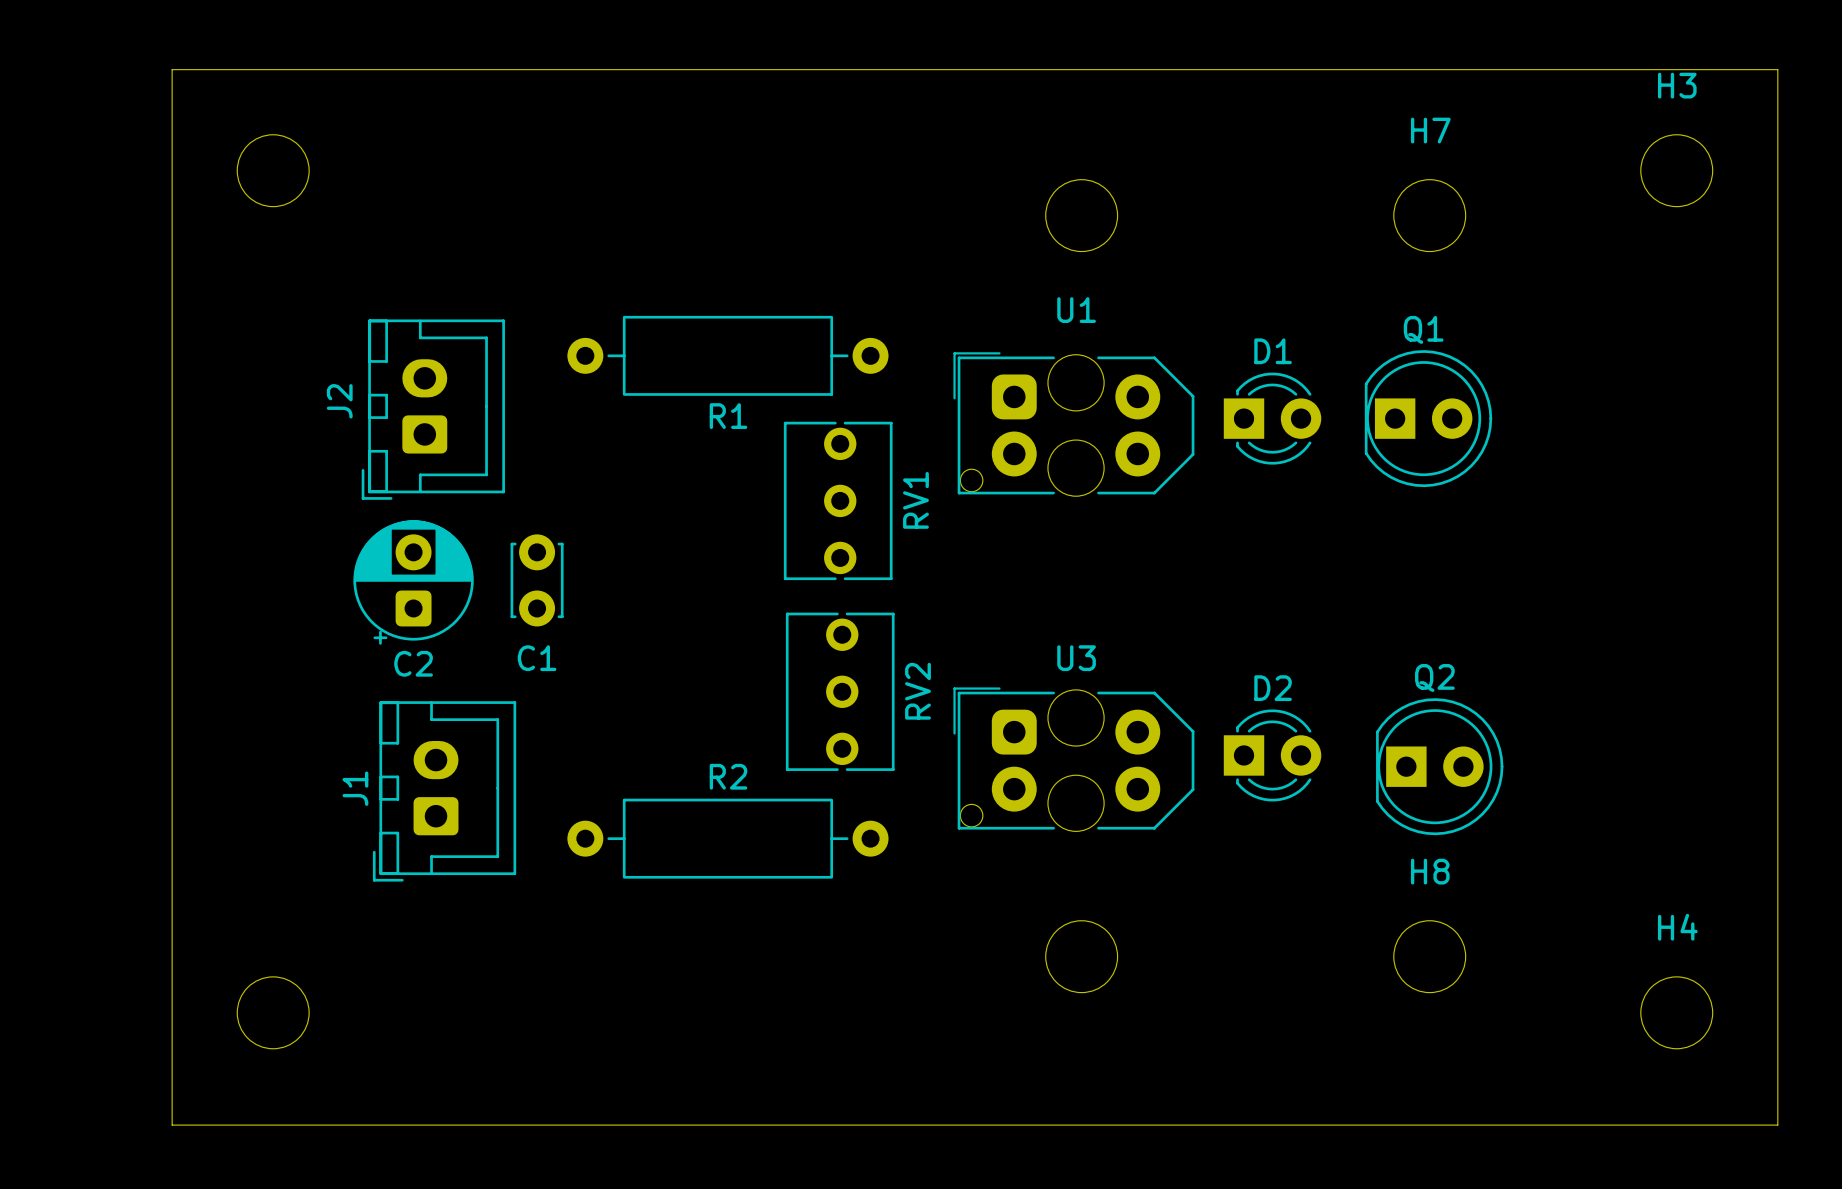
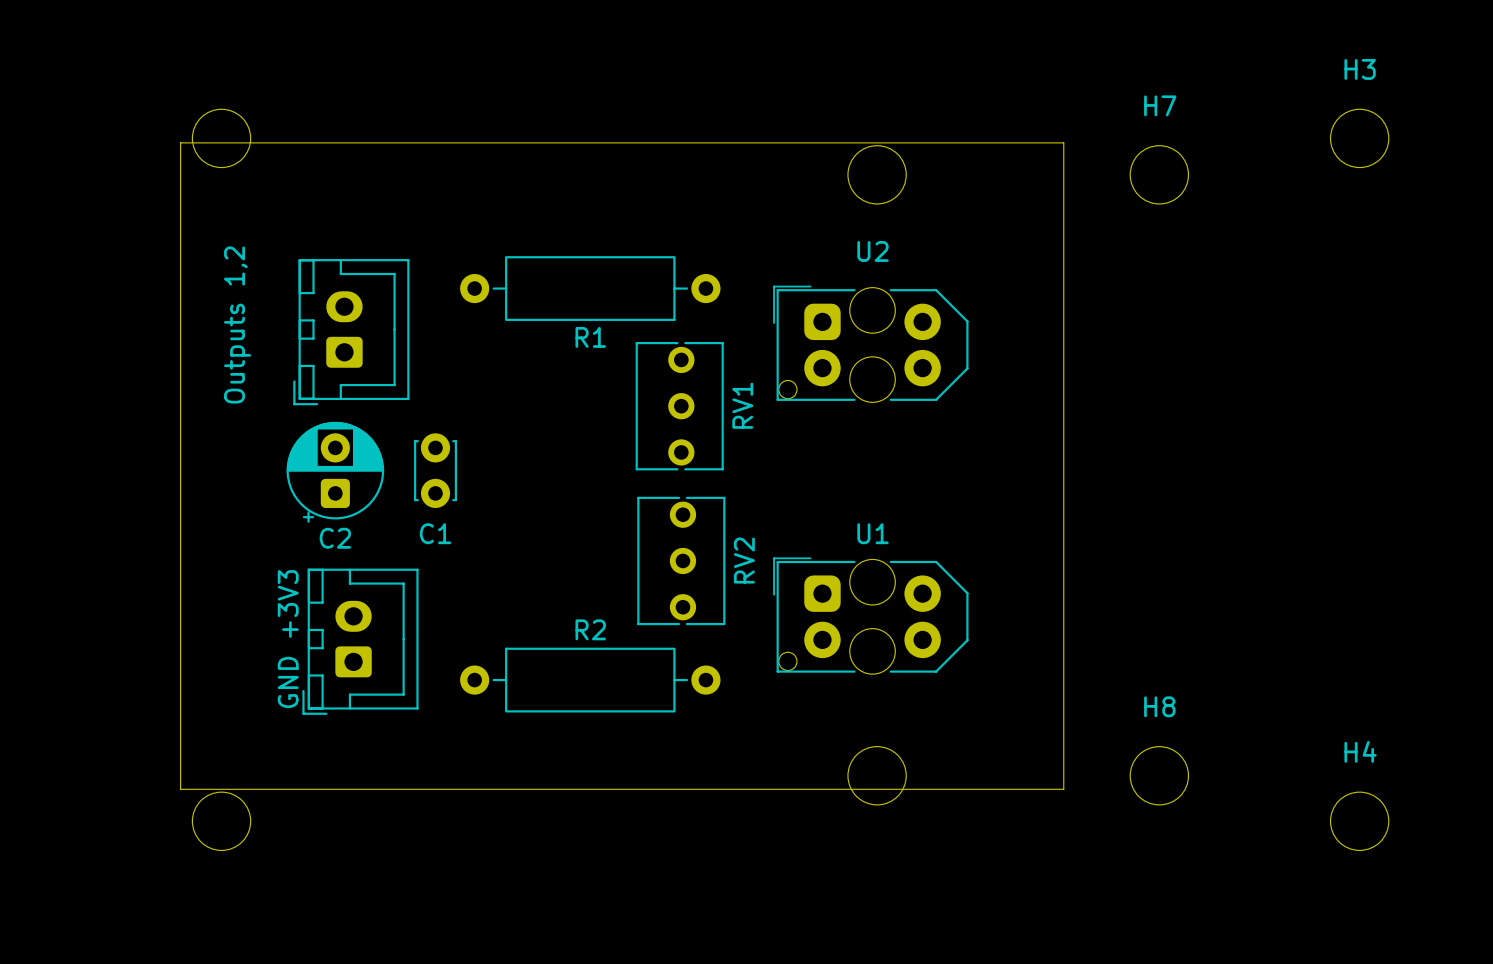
board edge: (172, 69) (1777, 69) (1777, 1125) (172, 1125) (172, 69) -> (180, 142) (180, 789) (1063, 789) (1063, 142) (180, 142)
U1 name: U1 (1076, 310) -> U2 (872, 251)
J2 name: J2 (339, 401) -> Outputs 1,2 (237, 324)
D1: (1272, 418) -> none
Q1: (1428, 418) -> none
U3 name: U3 (1076, 658) -> U1 (872, 533)
D2: (1272, 755) -> none
Q2: (1439, 766) -> none
J1 name: J1 (355, 788) -> GND +3V3 (288, 639)

